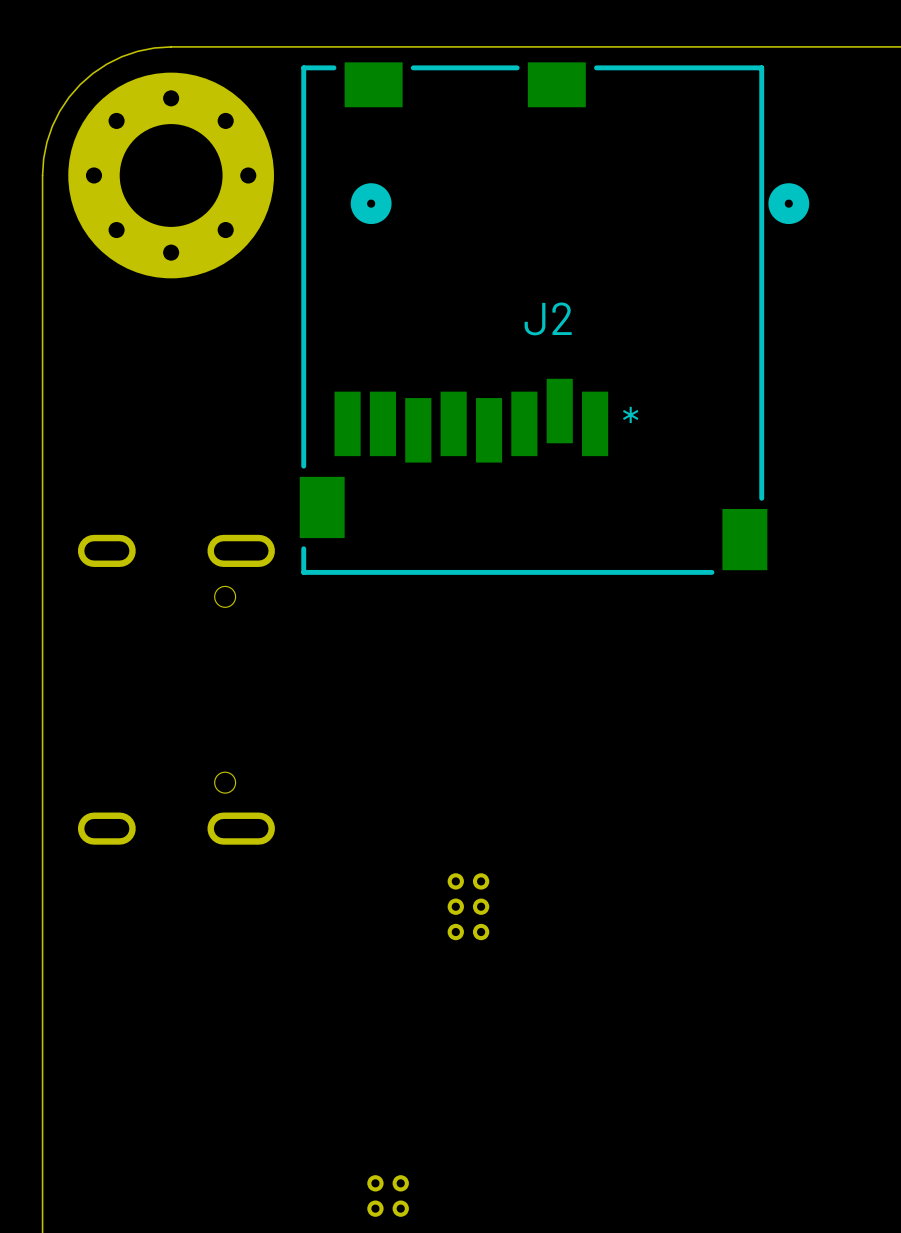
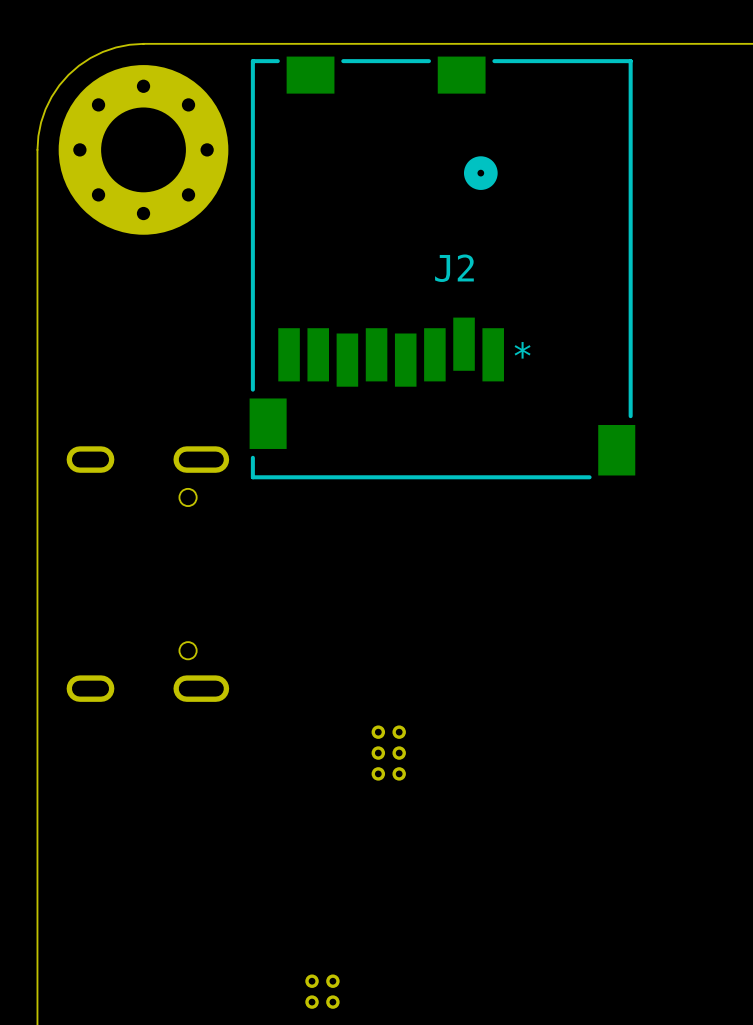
part: (371, 203) -> none
part: none -> (480, 173)
part: (788, 203) -> none

